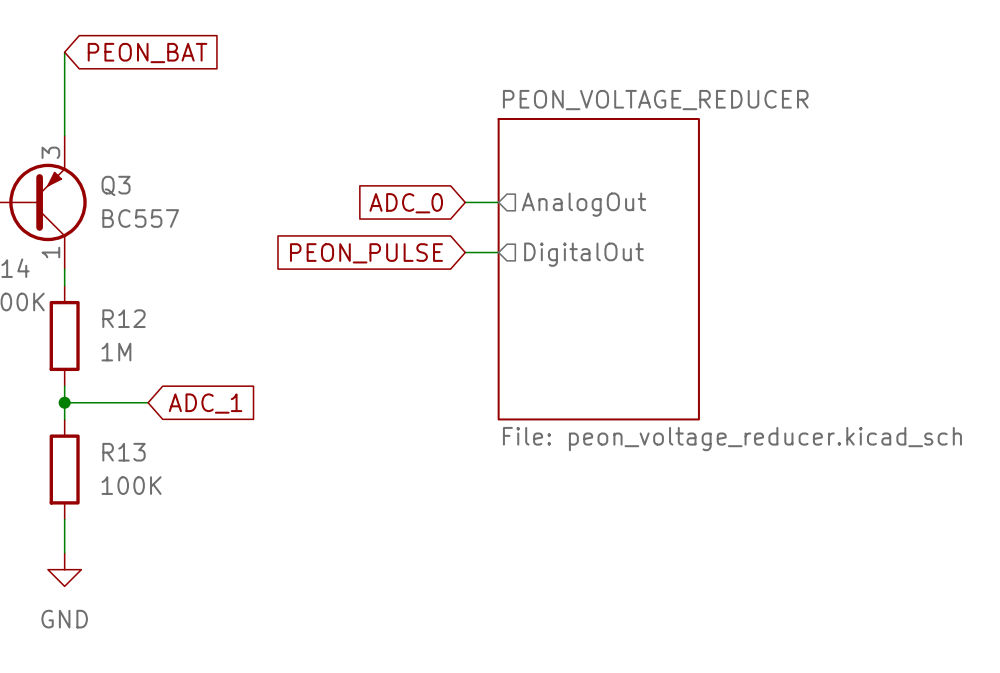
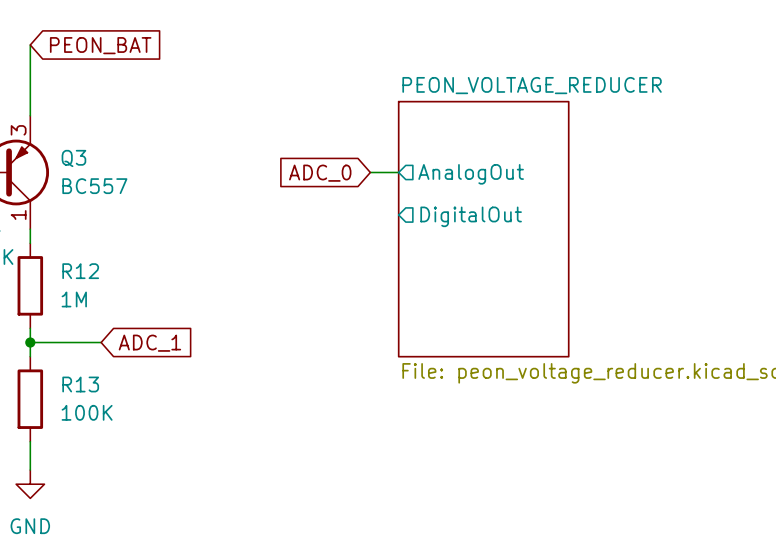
wire: (465, 252) (498, 252) -> none
global label: PEON_PULSE (366, 253) -> none

